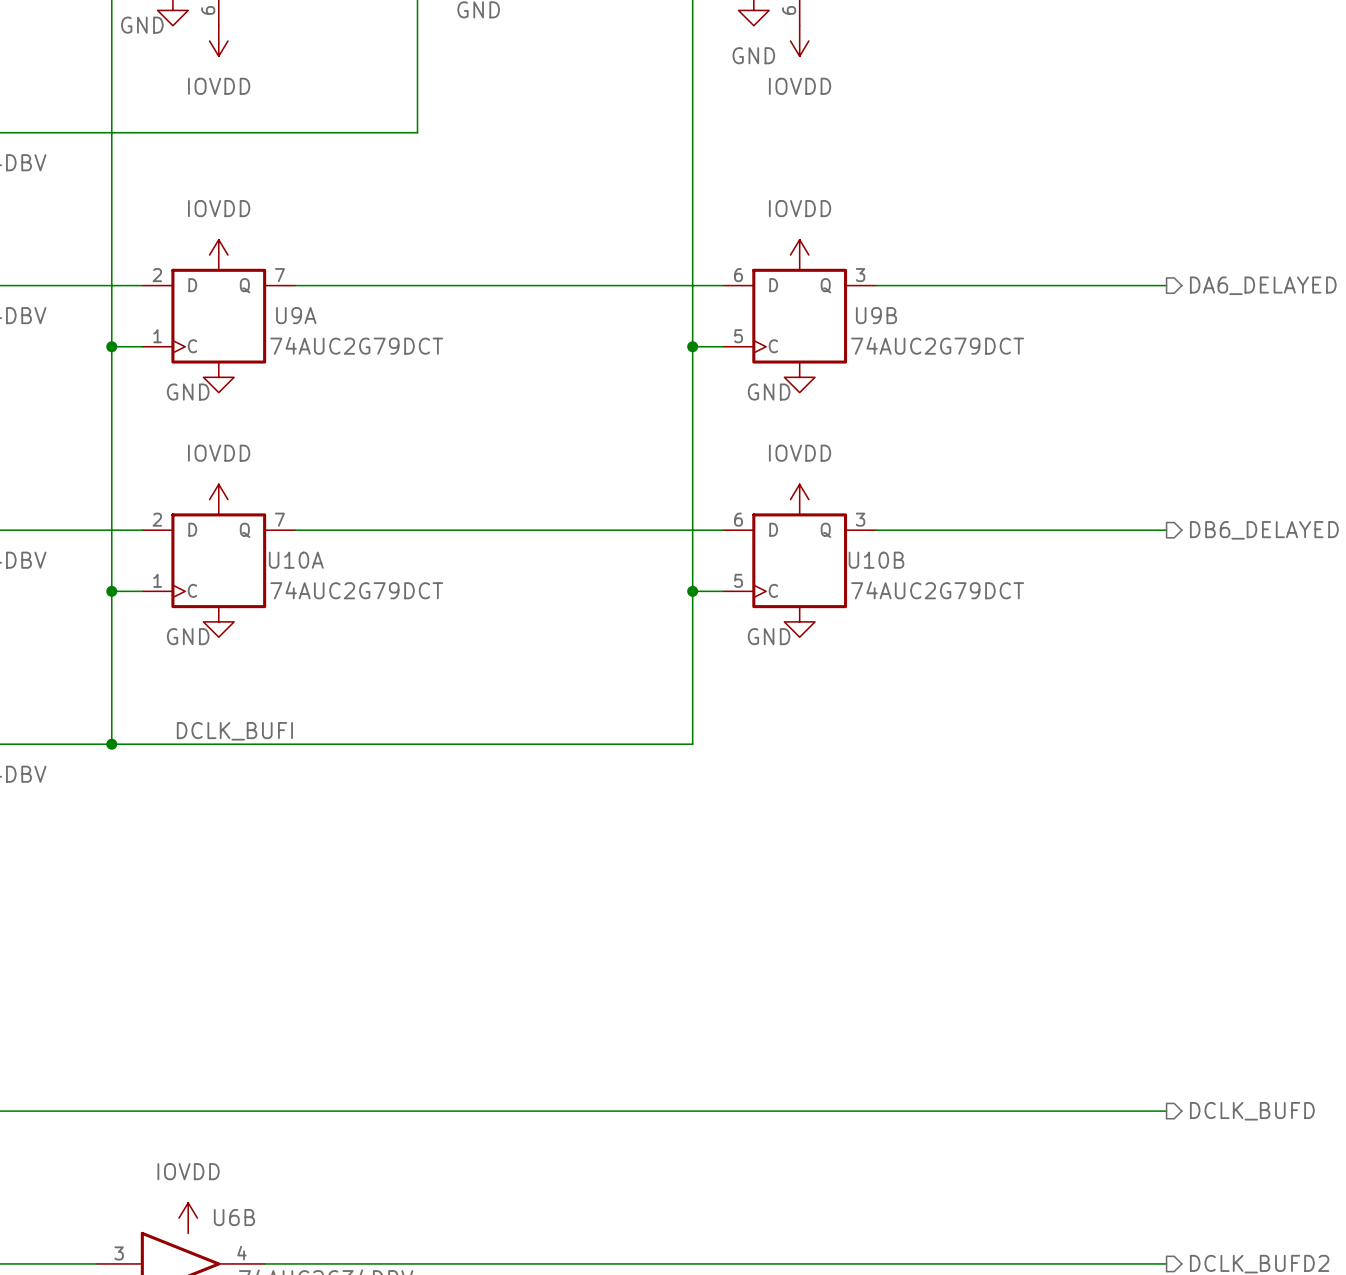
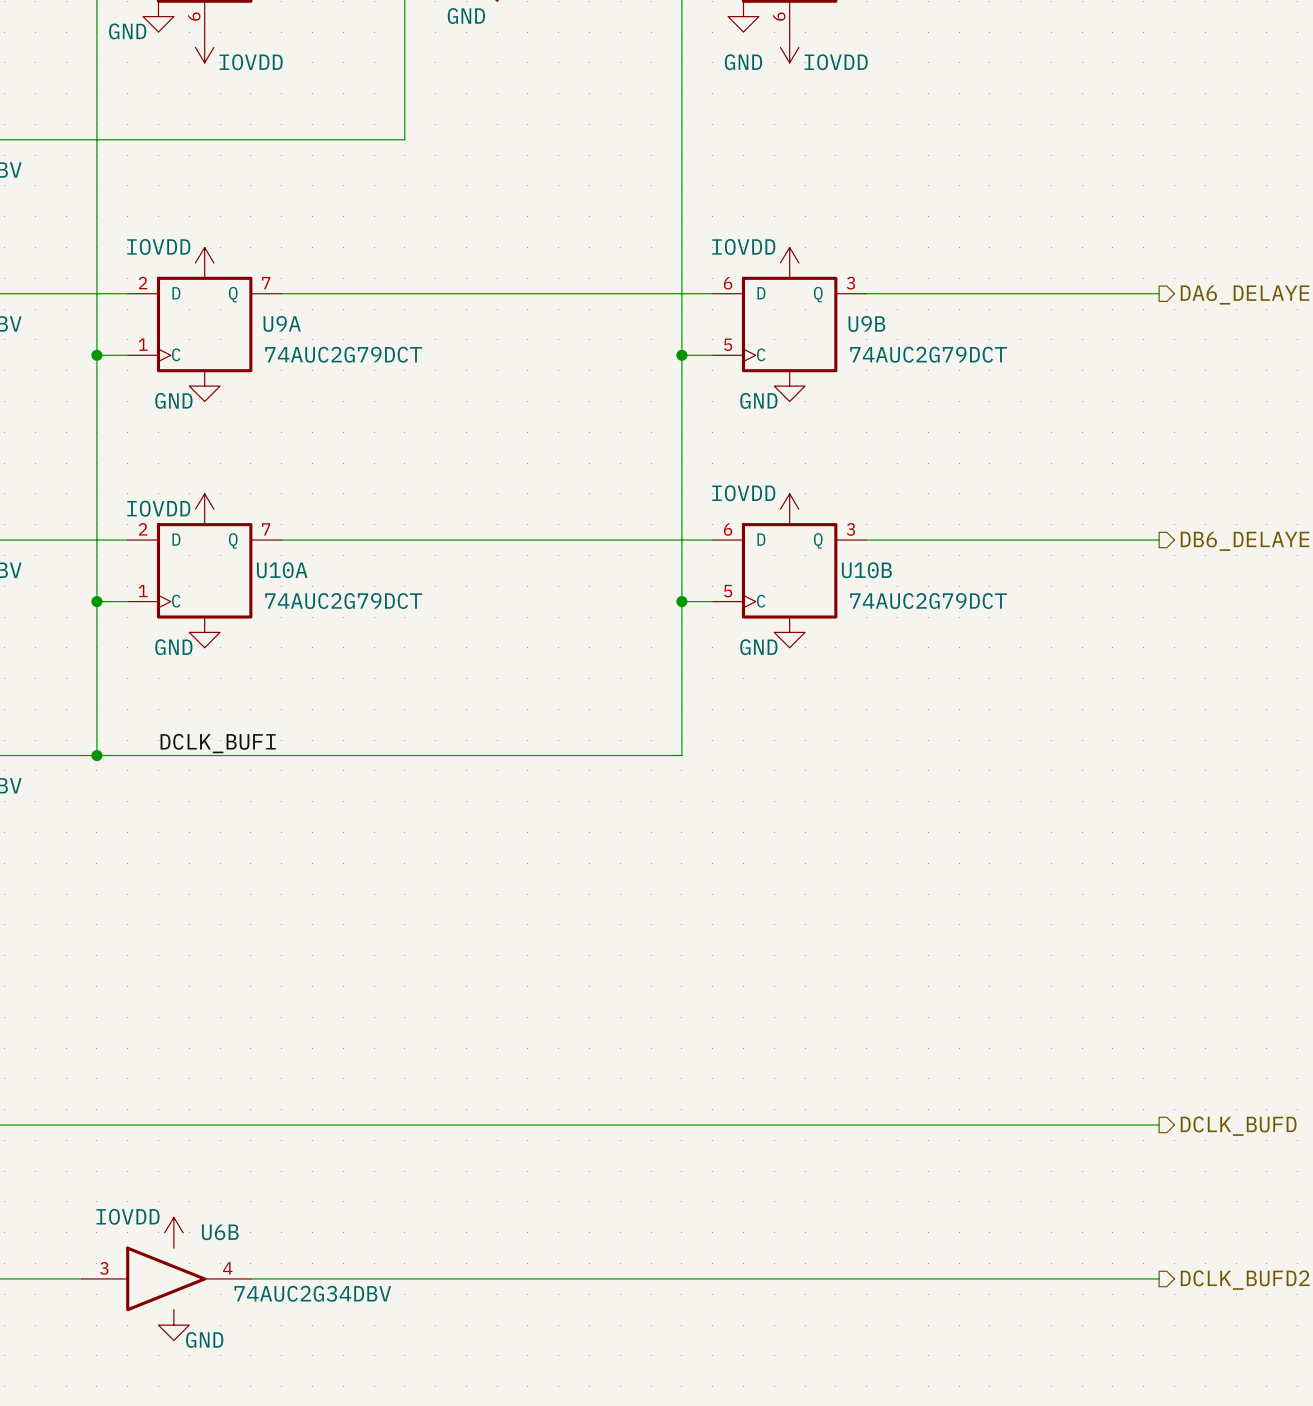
power symbol text position: IOVDD (219, 86) -> IOVDD (251, 62)
power symbol text position: IOVDD (800, 86) -> IOVDD (836, 62)
power symbol text position: IOVDD (219, 208) -> IOVDD (158, 246)
power symbol text position: IOVDD (800, 208) -> IOVDD (743, 246)
power symbol text position: IOVDD (219, 453) -> IOVDD (158, 508)
power symbol text position: IOVDD (800, 453) -> IOVDD (743, 493)
power symbol text position: IOVDD (188, 1171) -> IOVDD (128, 1216)

